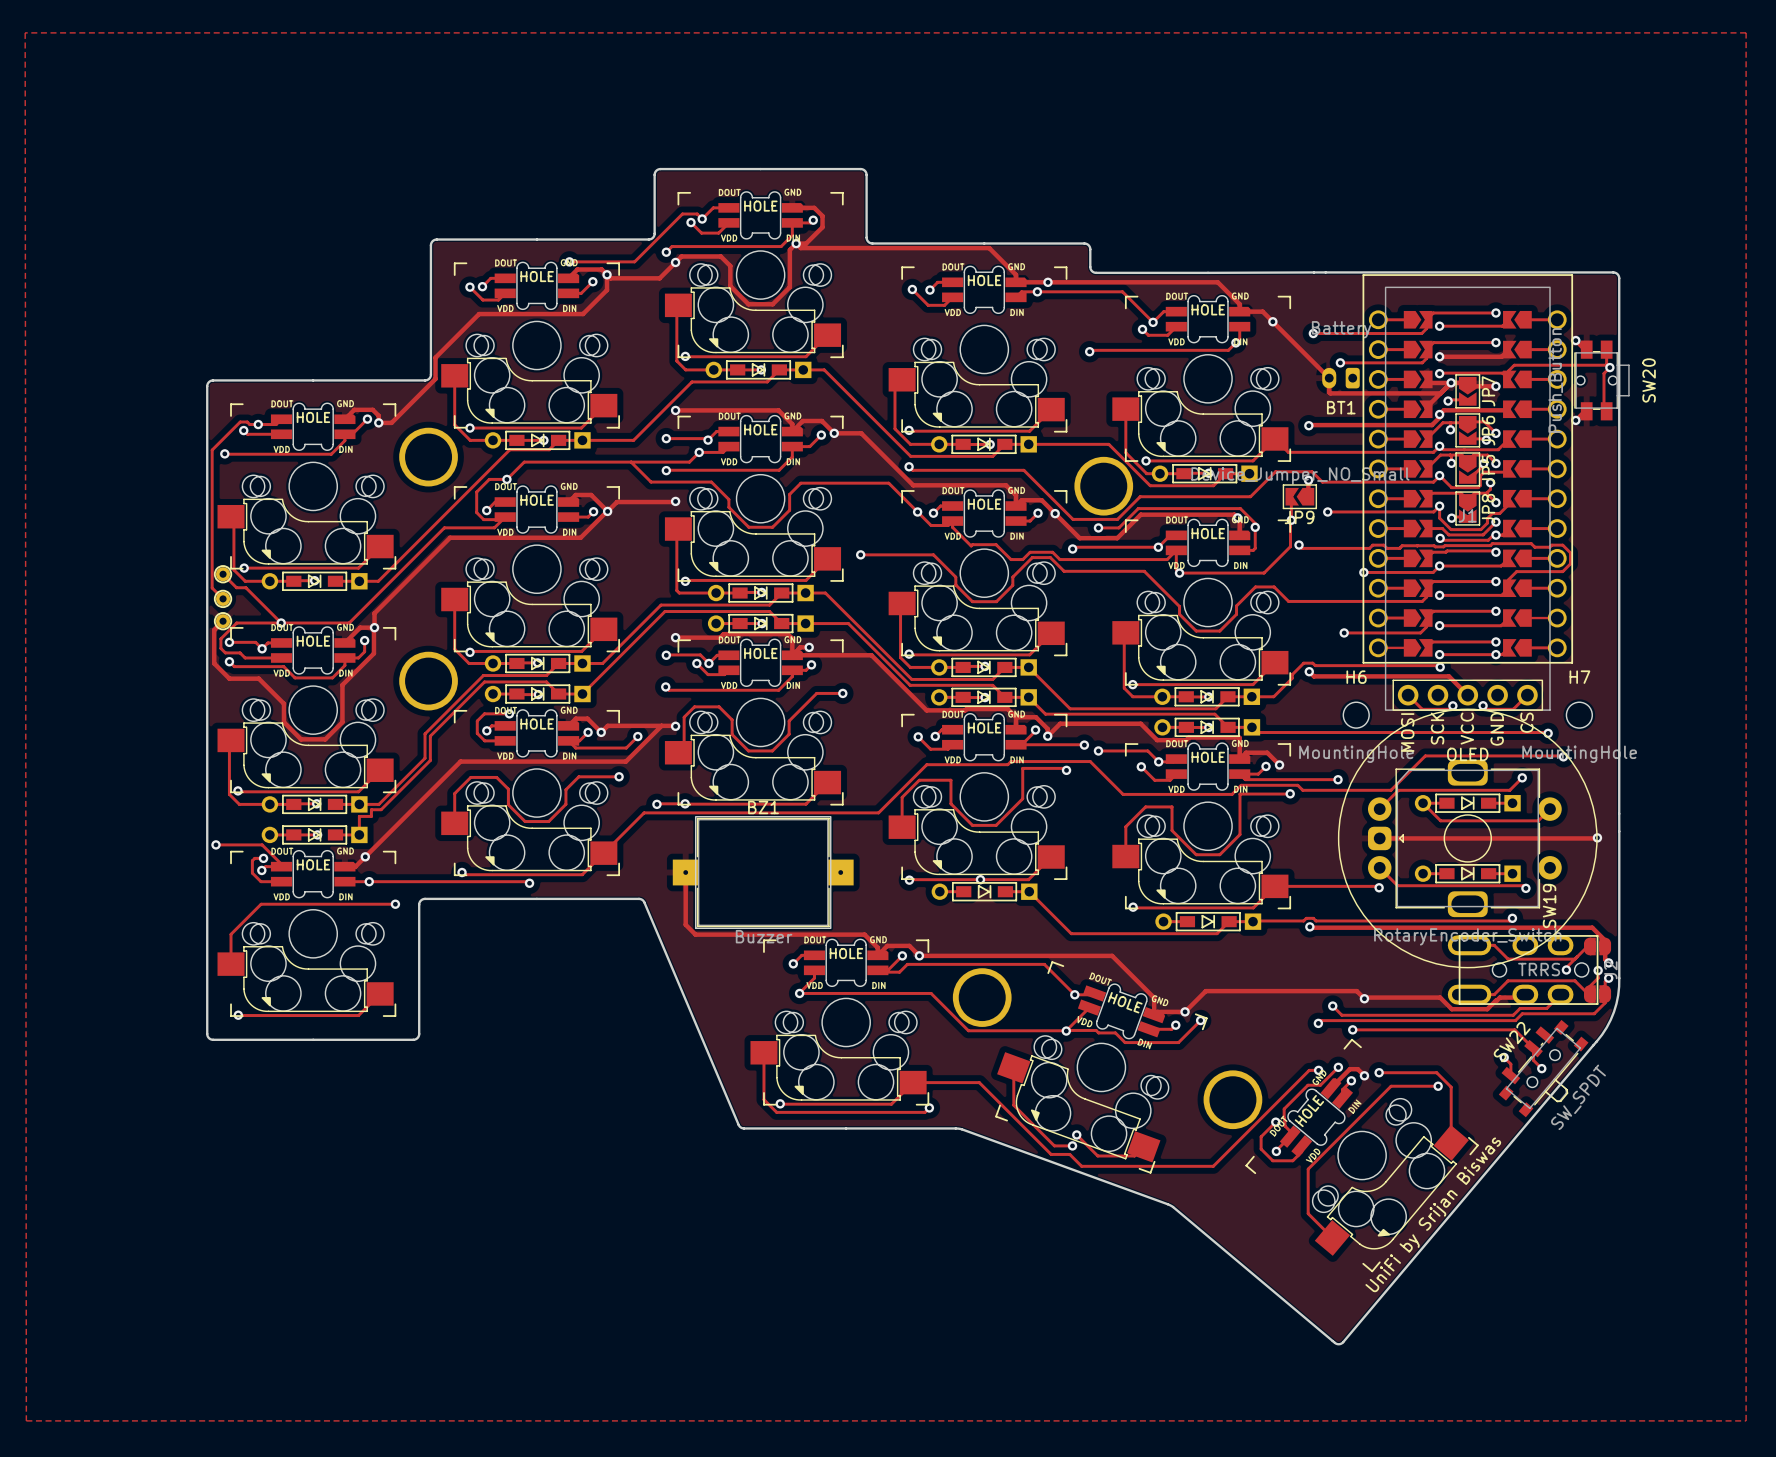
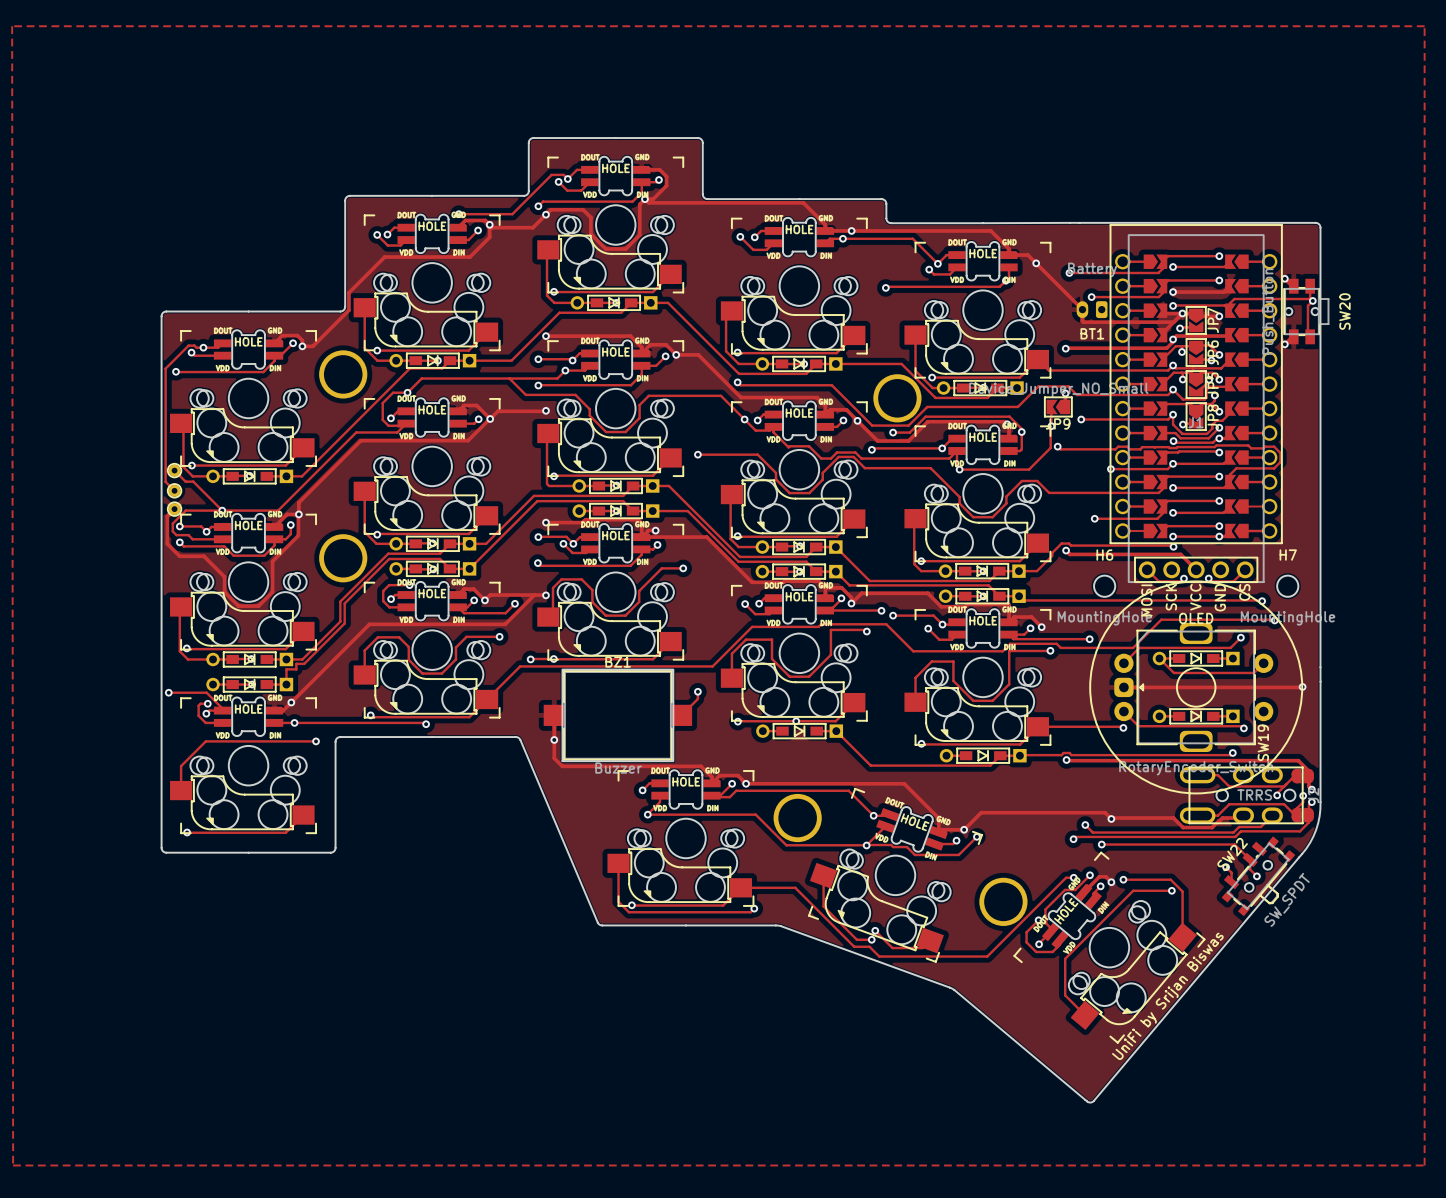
BZ1 footprint: [672, 816, 854, 929] -> [543, 669, 693, 762]
track: none -> (697, 691) (697, 698) (681, 715)
via: none -> (697, 691)
via: none -> (554, 739)

